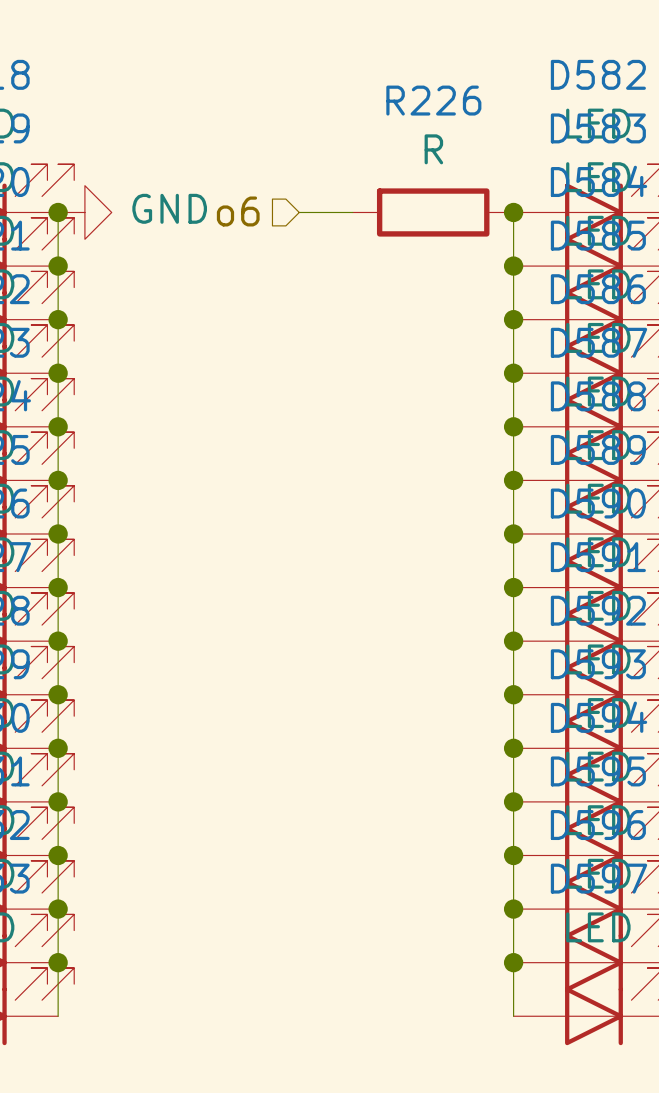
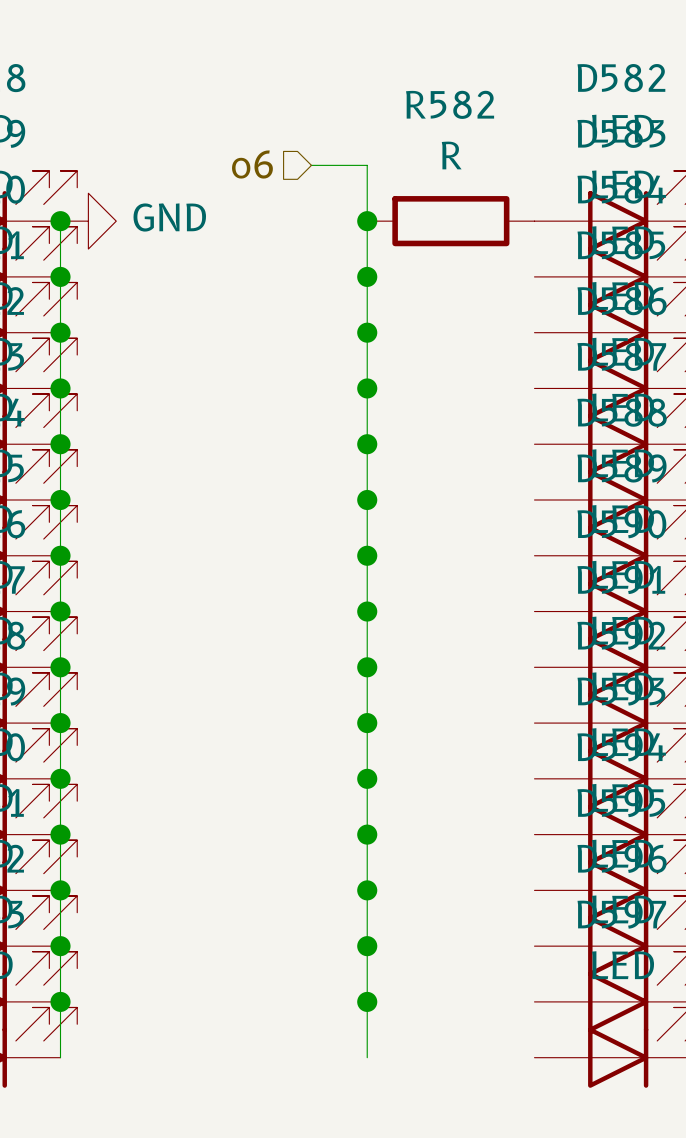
R226 name: R226 (433, 100) -> R582 (450, 104)
wire: none -> (311, 165) (367, 165) (367, 1057)
hierarchical label position: o6 (238, 211) -> o6 (252, 164)
wire: (299, 212) (352, 212) -> none
junction: none -> (367, 221)
wire: (513, 212) (513, 1016) -> none
junction: (513, 212) -> none
junction: none -> (367, 276)
junction: (513, 266) -> none
junction: none -> (367, 332)
junction: (513, 319) -> none
junction: none -> (367, 388)
junction: (513, 373) -> none
junction: none -> (367, 444)
junction: (513, 426) -> none
junction: none -> (367, 499)
junction: (513, 480) -> none
junction: none -> (367, 555)
junction: (513, 533) -> none
junction: none -> (367, 611)
junction: (513, 587) -> none
junction: none -> (367, 667)
junction: (513, 641) -> none
junction: none -> (367, 723)
junction: (513, 694) -> none
junction: none -> (367, 778)
junction: (513, 748) -> none
junction: none -> (367, 834)
junction: (513, 801) -> none
junction: none -> (367, 890)
junction: (513, 855) -> none
junction: none -> (367, 946)
junction: (513, 909) -> none
junction: none -> (367, 1001)
junction: (513, 962) -> none

